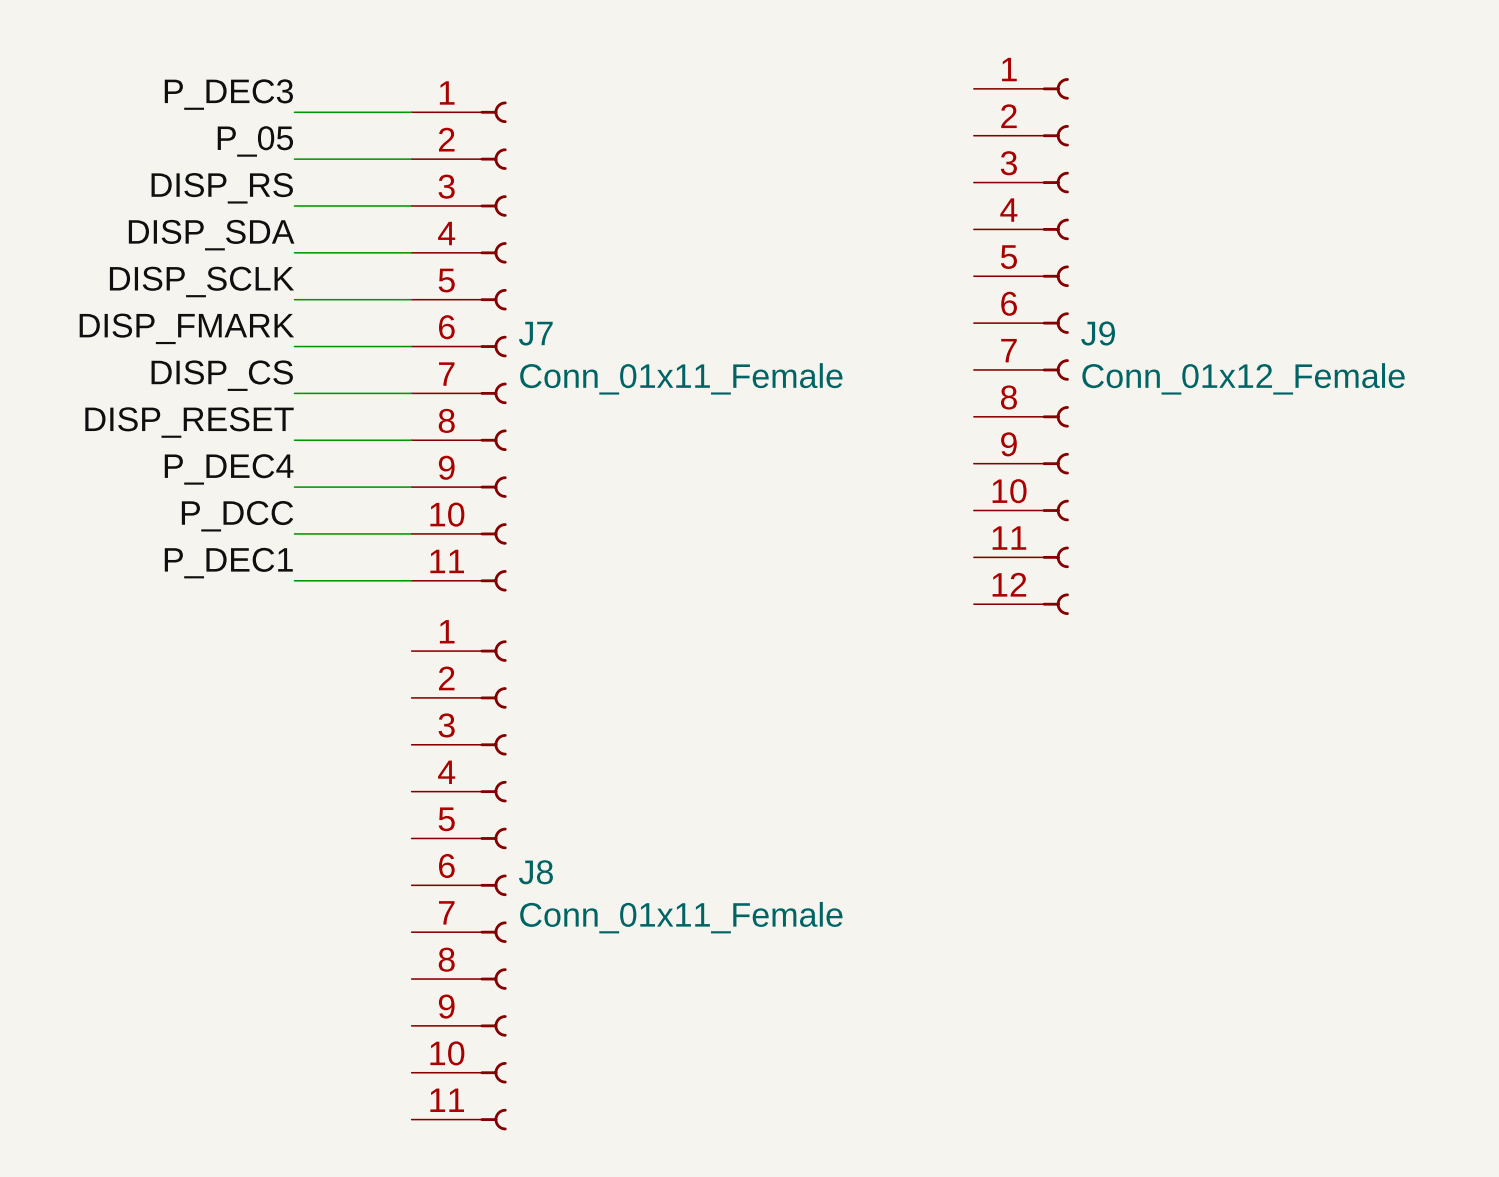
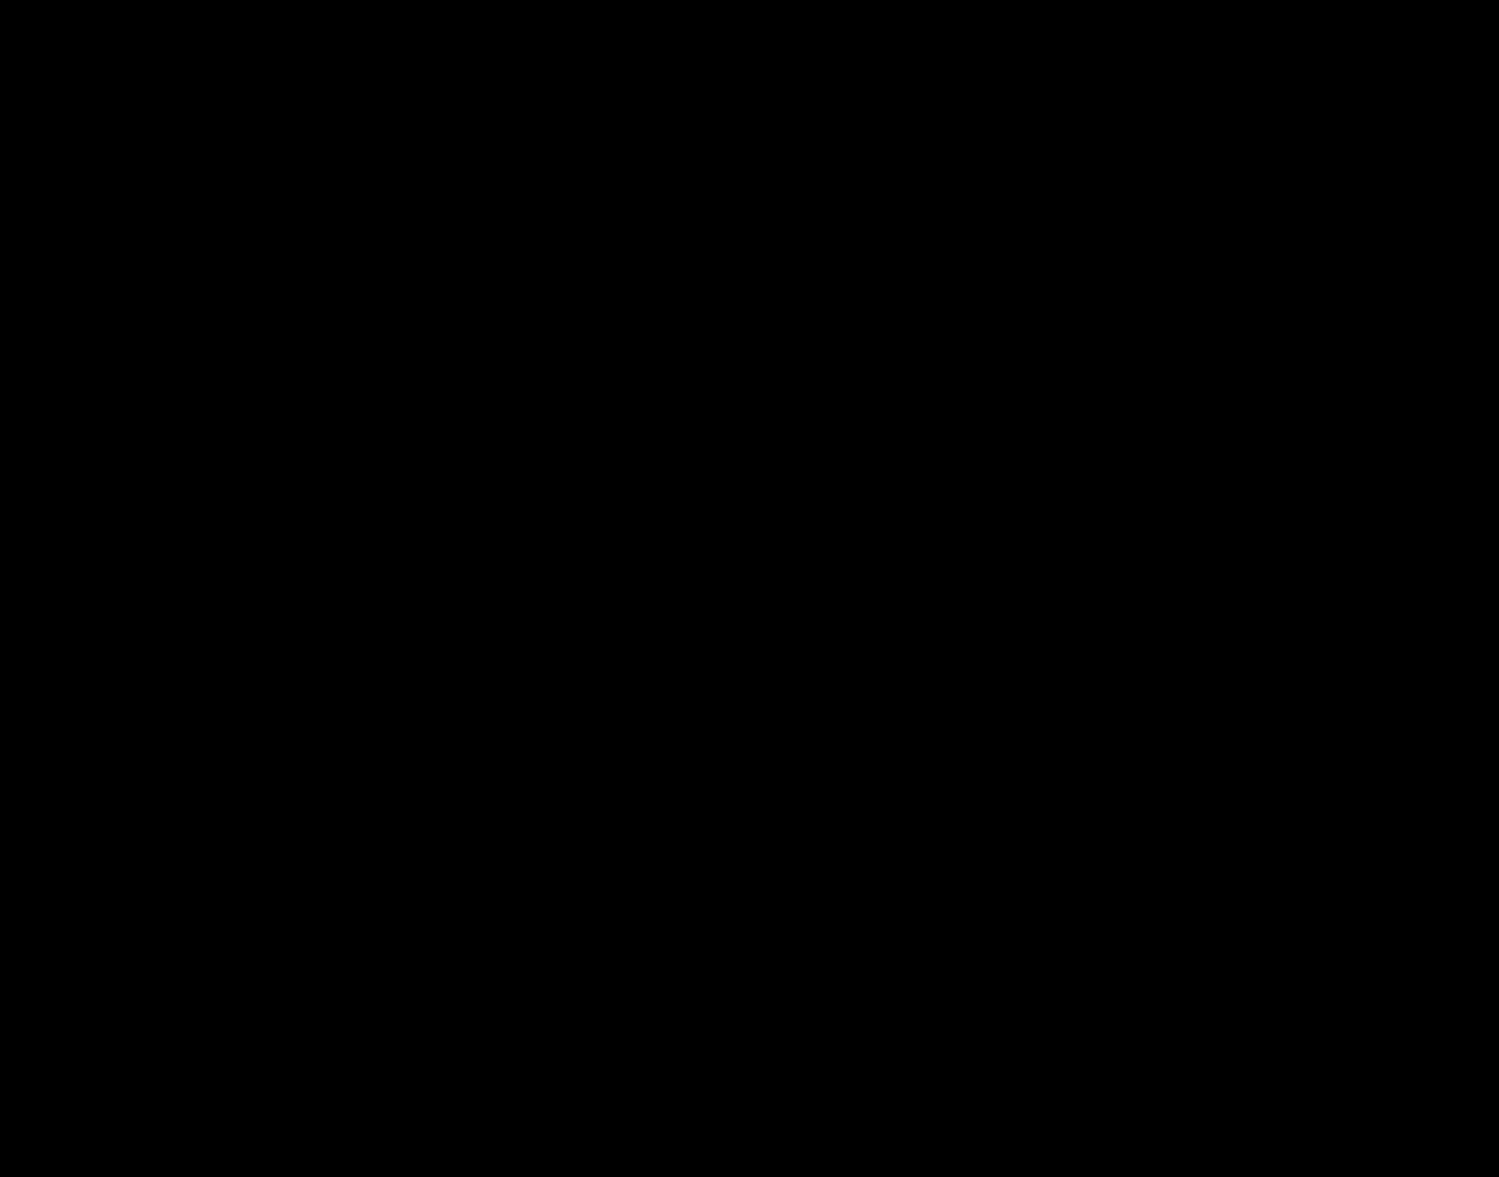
label: P_DEC3 (228, 94) -> none
wire: (294, 112) (411, 112) -> none
label: P_05 (255, 141) -> none
wire: (294, 159) (411, 159) -> none
label: DISP_RS (222, 188) -> none
wire: (294, 205) (411, 205) -> none
label: DISP_SDA (211, 235) -> none
wire: (294, 252) (411, 252) -> none
label: DISP_SCLK (202, 281) -> none
wire: (294, 299) (411, 299) -> none
label: DISP_FMARK (186, 328) -> none
wire: (294, 346) (411, 346) -> none
J7: Conn_01x11_Female (459, 346) -> none
J9: Conn_01x12_Female (1021, 346) -> none
label: DISP_CS (222, 375) -> none
wire: (294, 393) (411, 393) -> none
label: DISP_RESET (189, 422) -> none
wire: (294, 440) (411, 440) -> none
label: P_DEC4 (229, 469) -> none
wire: (294, 487) (411, 487) -> none
label: P_DCC (237, 516) -> none
wire: (294, 533) (411, 533) -> none
label: P_DEC1 (228, 563) -> none
wire: (294, 580) (411, 580) -> none
J8: Conn_01x11_Female (459, 885) -> none

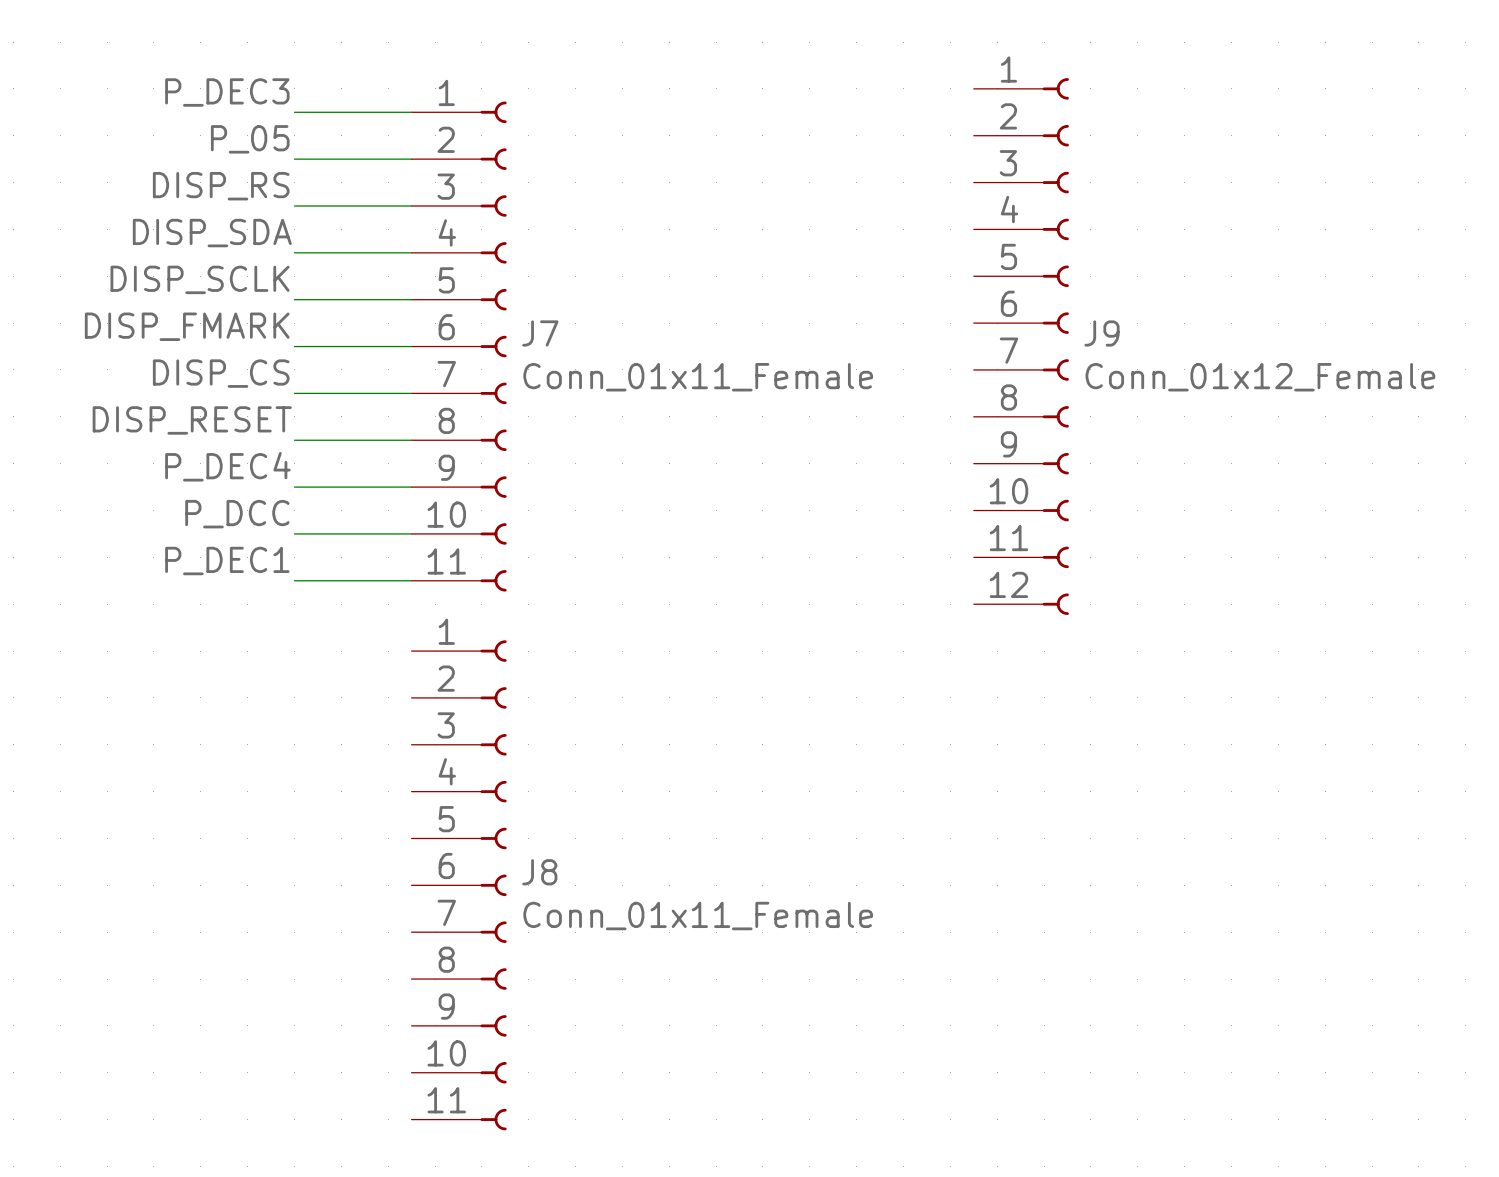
label: none -> P_DEC3 (227, 92)
wire: none -> (294, 112) (411, 112)
label: none -> P_05 (250, 139)
wire: none -> (294, 159) (411, 159)
label: none -> DISP_RS (221, 186)
wire: none -> (294, 205) (411, 205)
label: none -> DISP_SDA (212, 233)
wire: none -> (294, 252) (411, 252)
label: none -> DISP_SCLK (200, 279)
wire: none -> (294, 299) (411, 299)
label: none -> DISP_FMARK (187, 326)
wire: none -> (294, 346) (411, 346)
J7: none -> Conn_01x11_Female (459, 346)
J9: none -> Conn_01x12_Female (1021, 346)
label: none -> DISP_CS (221, 373)
wire: none -> (294, 393) (411, 393)
label: none -> DISP_RESET (192, 420)
wire: none -> (294, 440) (411, 440)
label: none -> P_DEC4 (227, 466)
wire: none -> (294, 487) (411, 487)
label: none -> P_DCC (237, 514)
wire: none -> (294, 533) (411, 533)
label: none -> P_DEC1 (227, 561)
wire: none -> (294, 580) (411, 580)
J8: none -> Conn_01x11_Female (459, 885)

